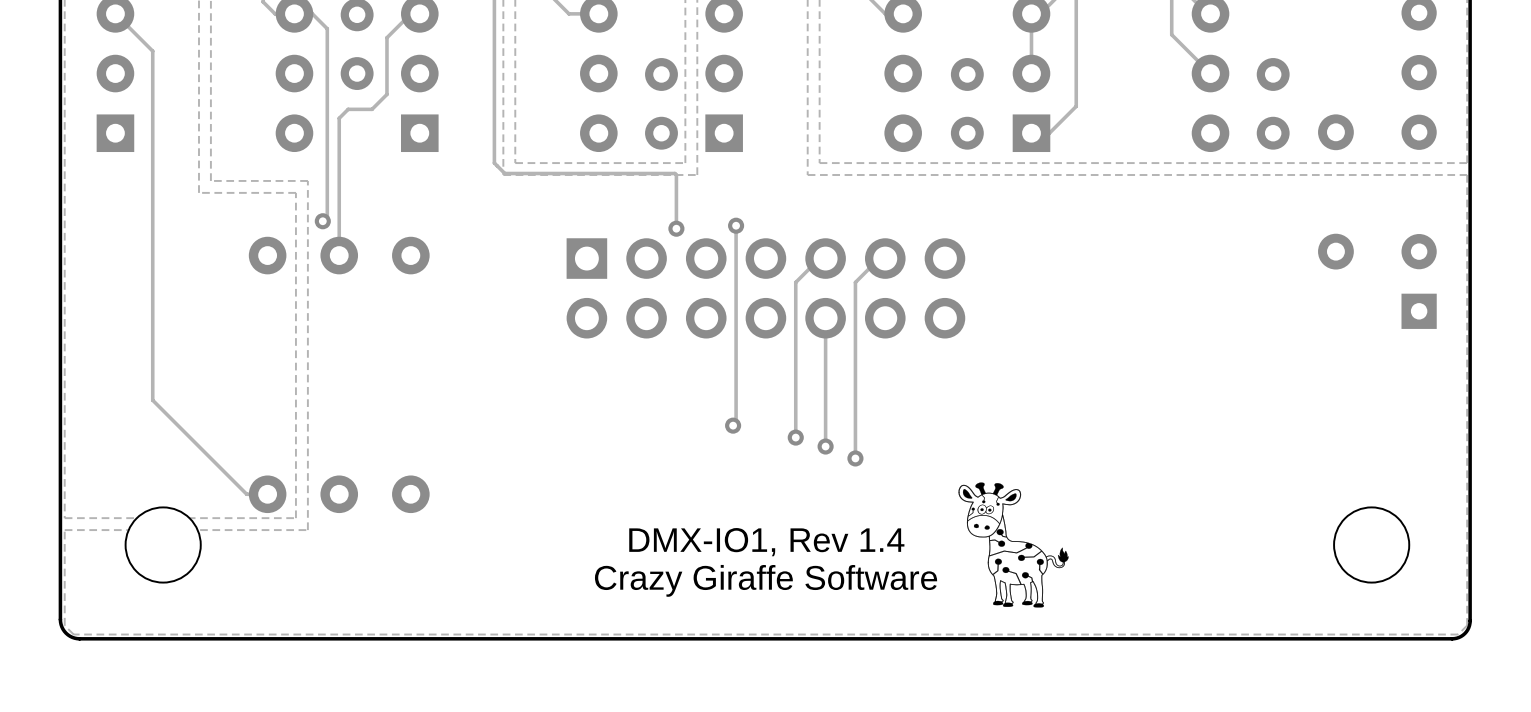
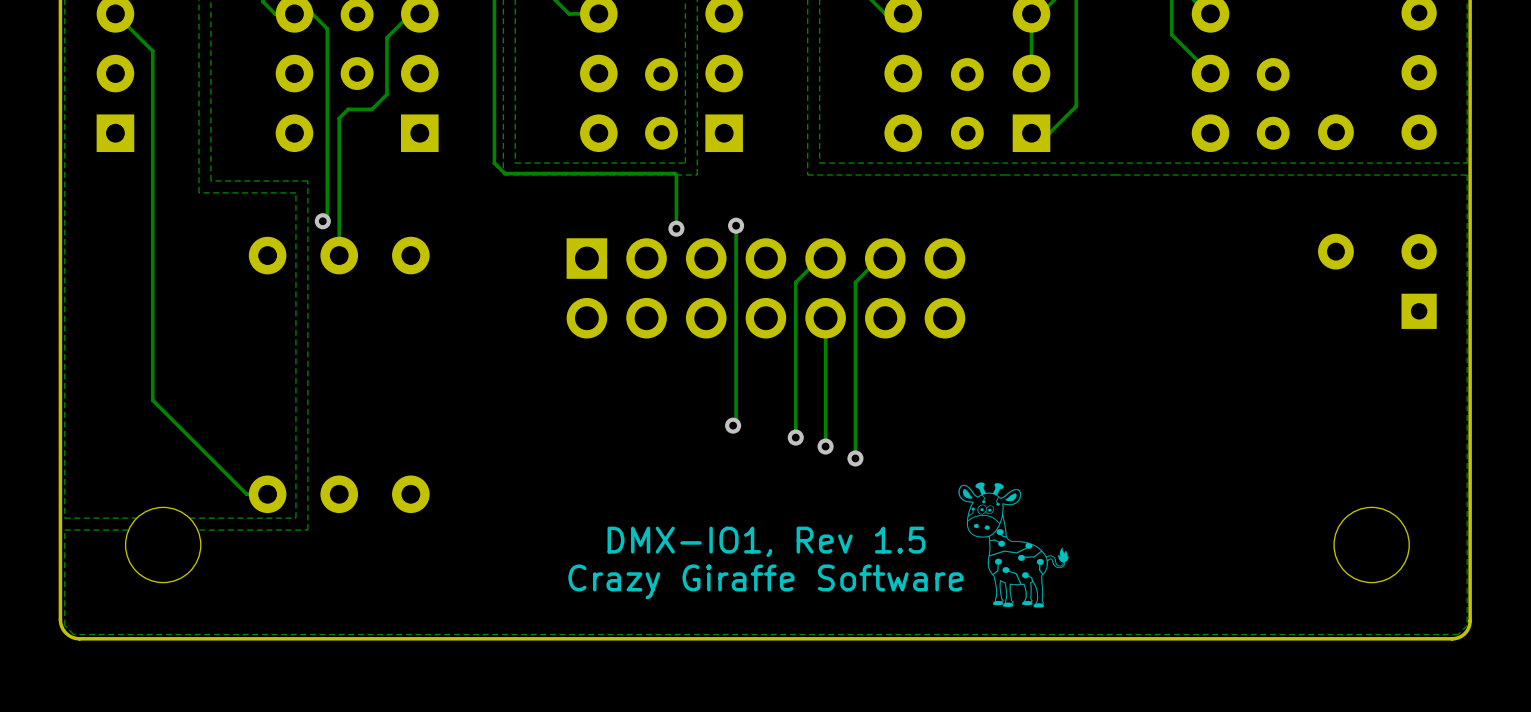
text: DMX-IO1, Rev 1.4 (766, 542) -> DMX-IO1, Rev 1.5 (766, 541)

